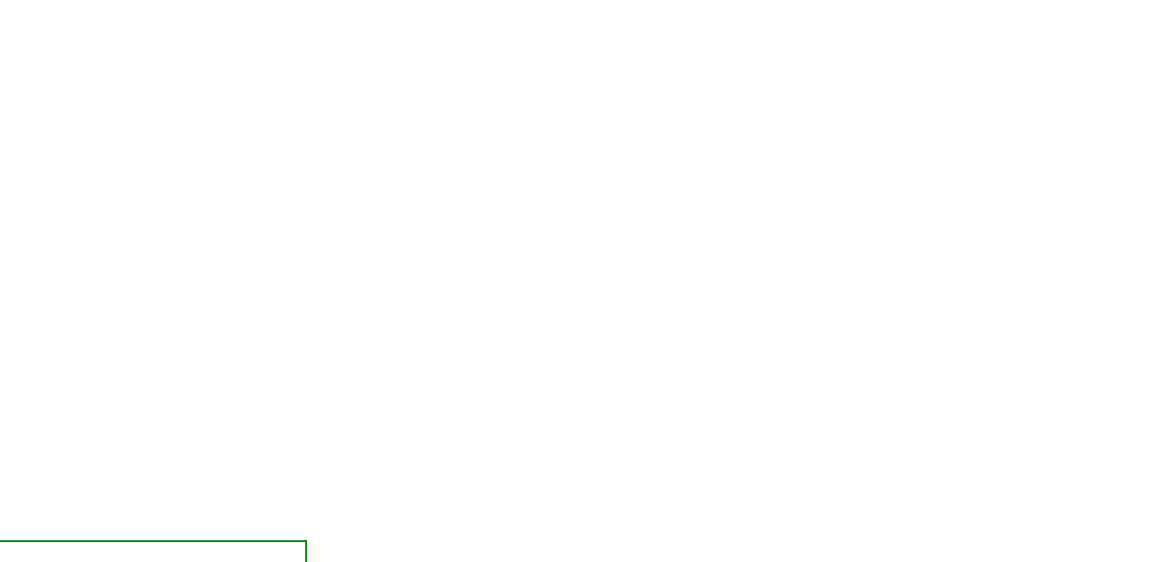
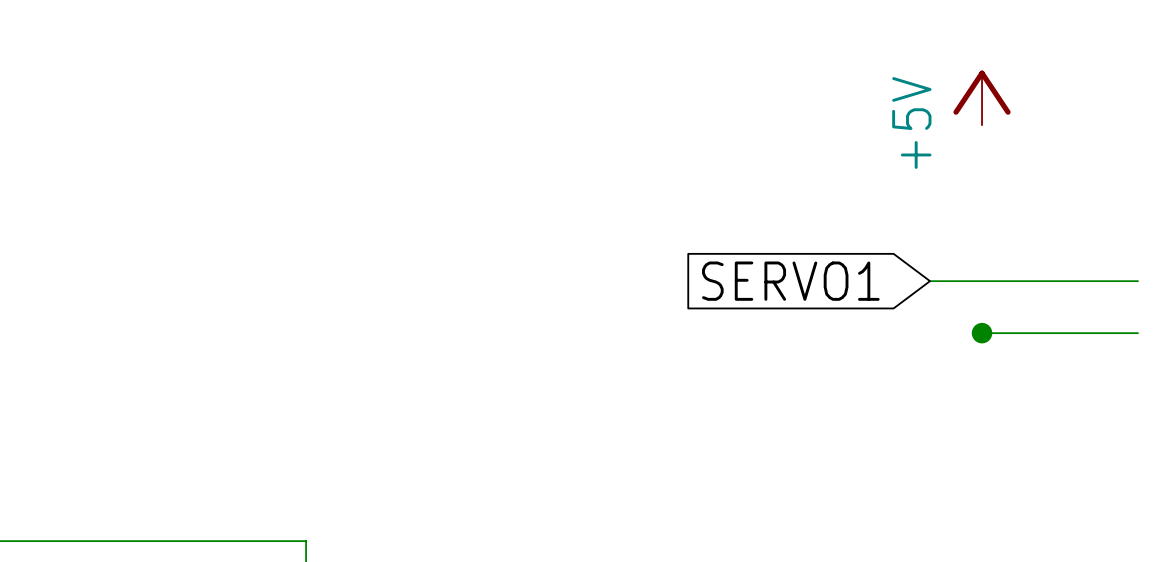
power symbol: none -> +5V (982, 97)
global label: none -> SERVO1 (790, 281)
wire: none -> (930, 281) (1138, 281)
wire: none -> (982, 333) (1138, 333)
junction: none -> (982, 333)

